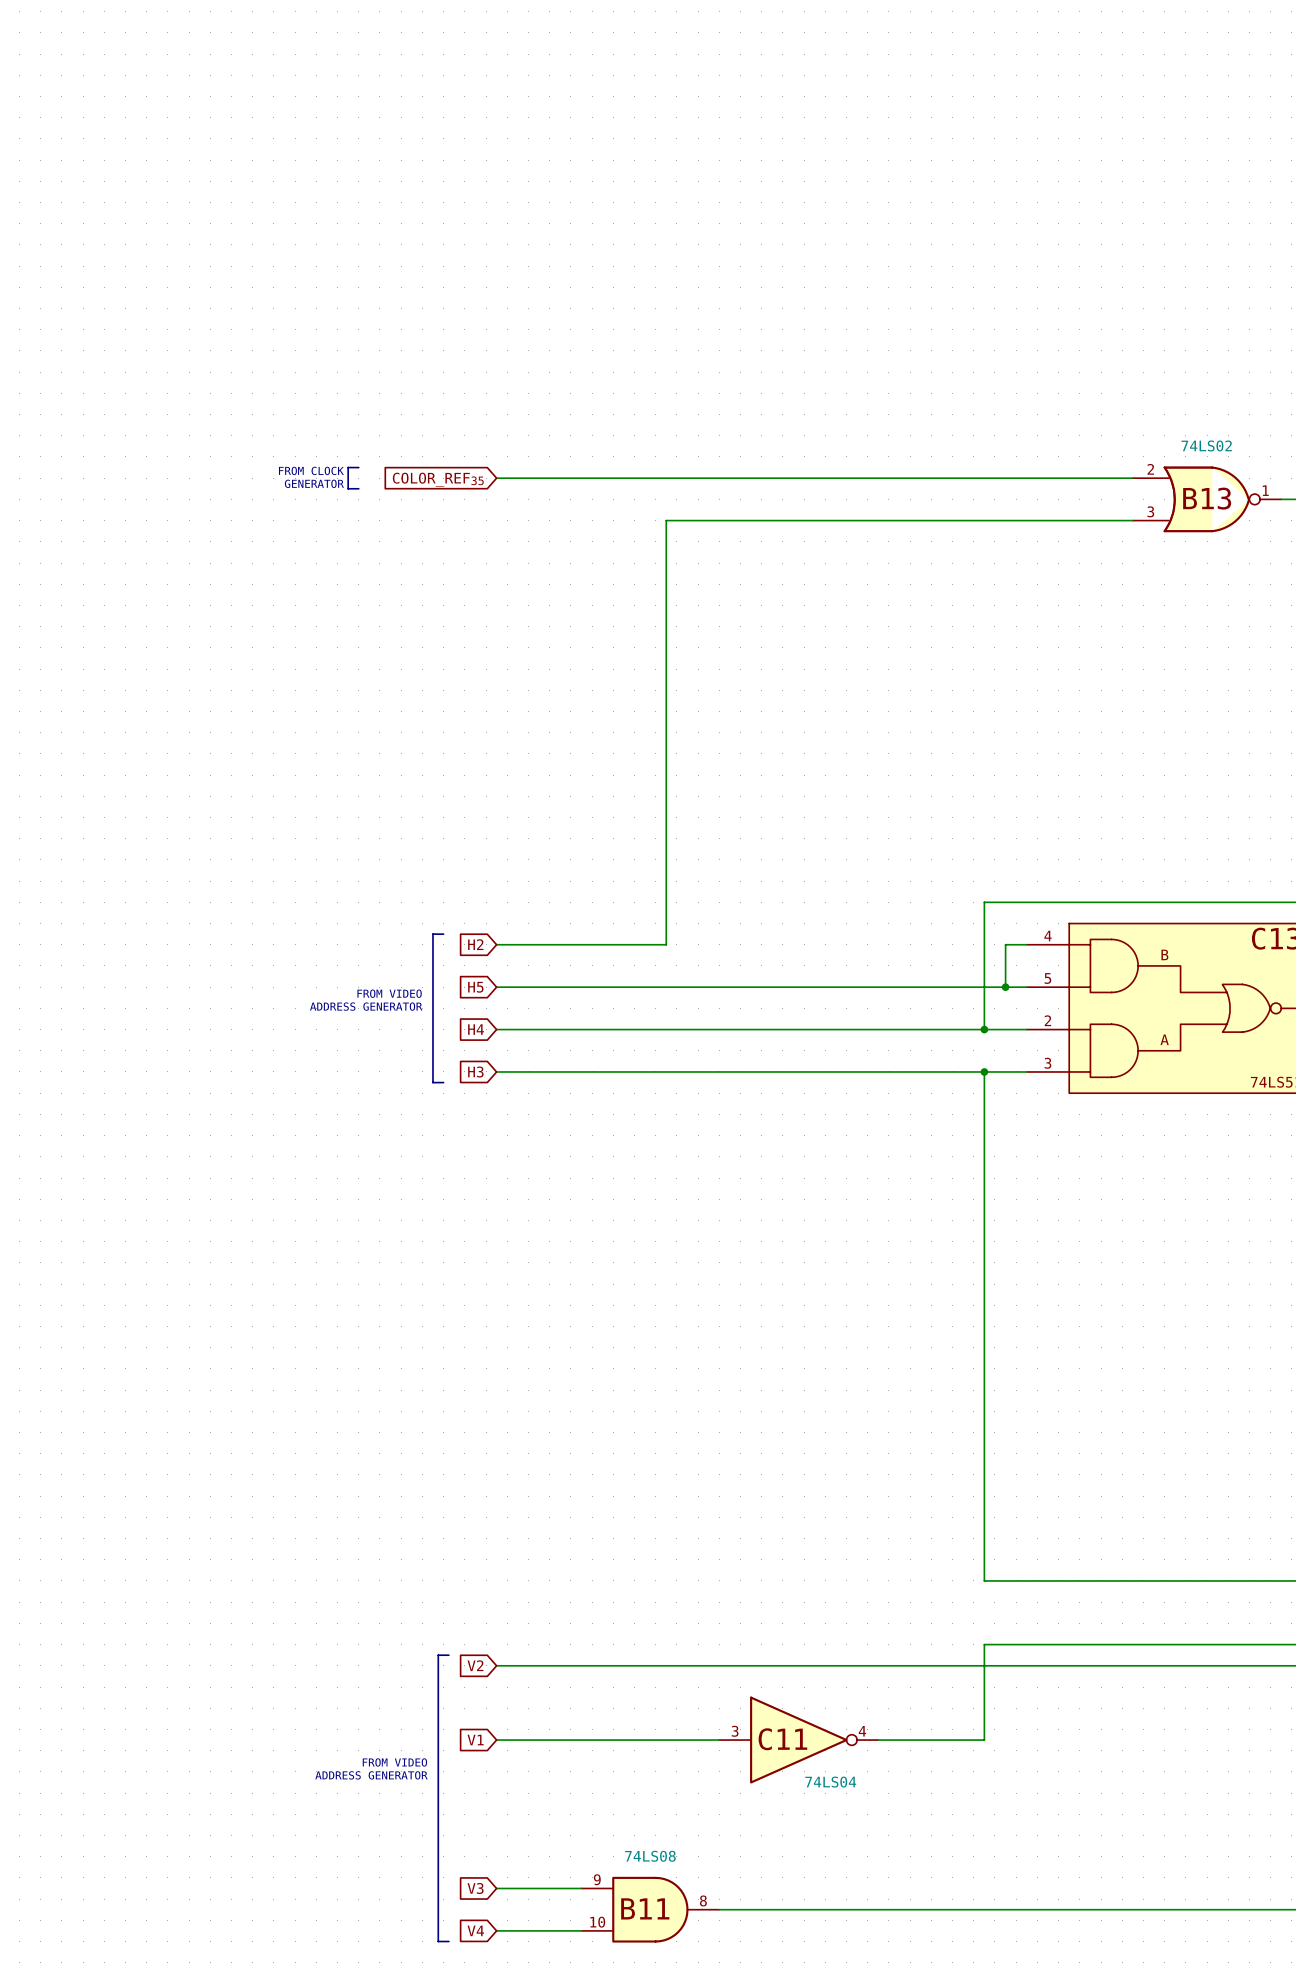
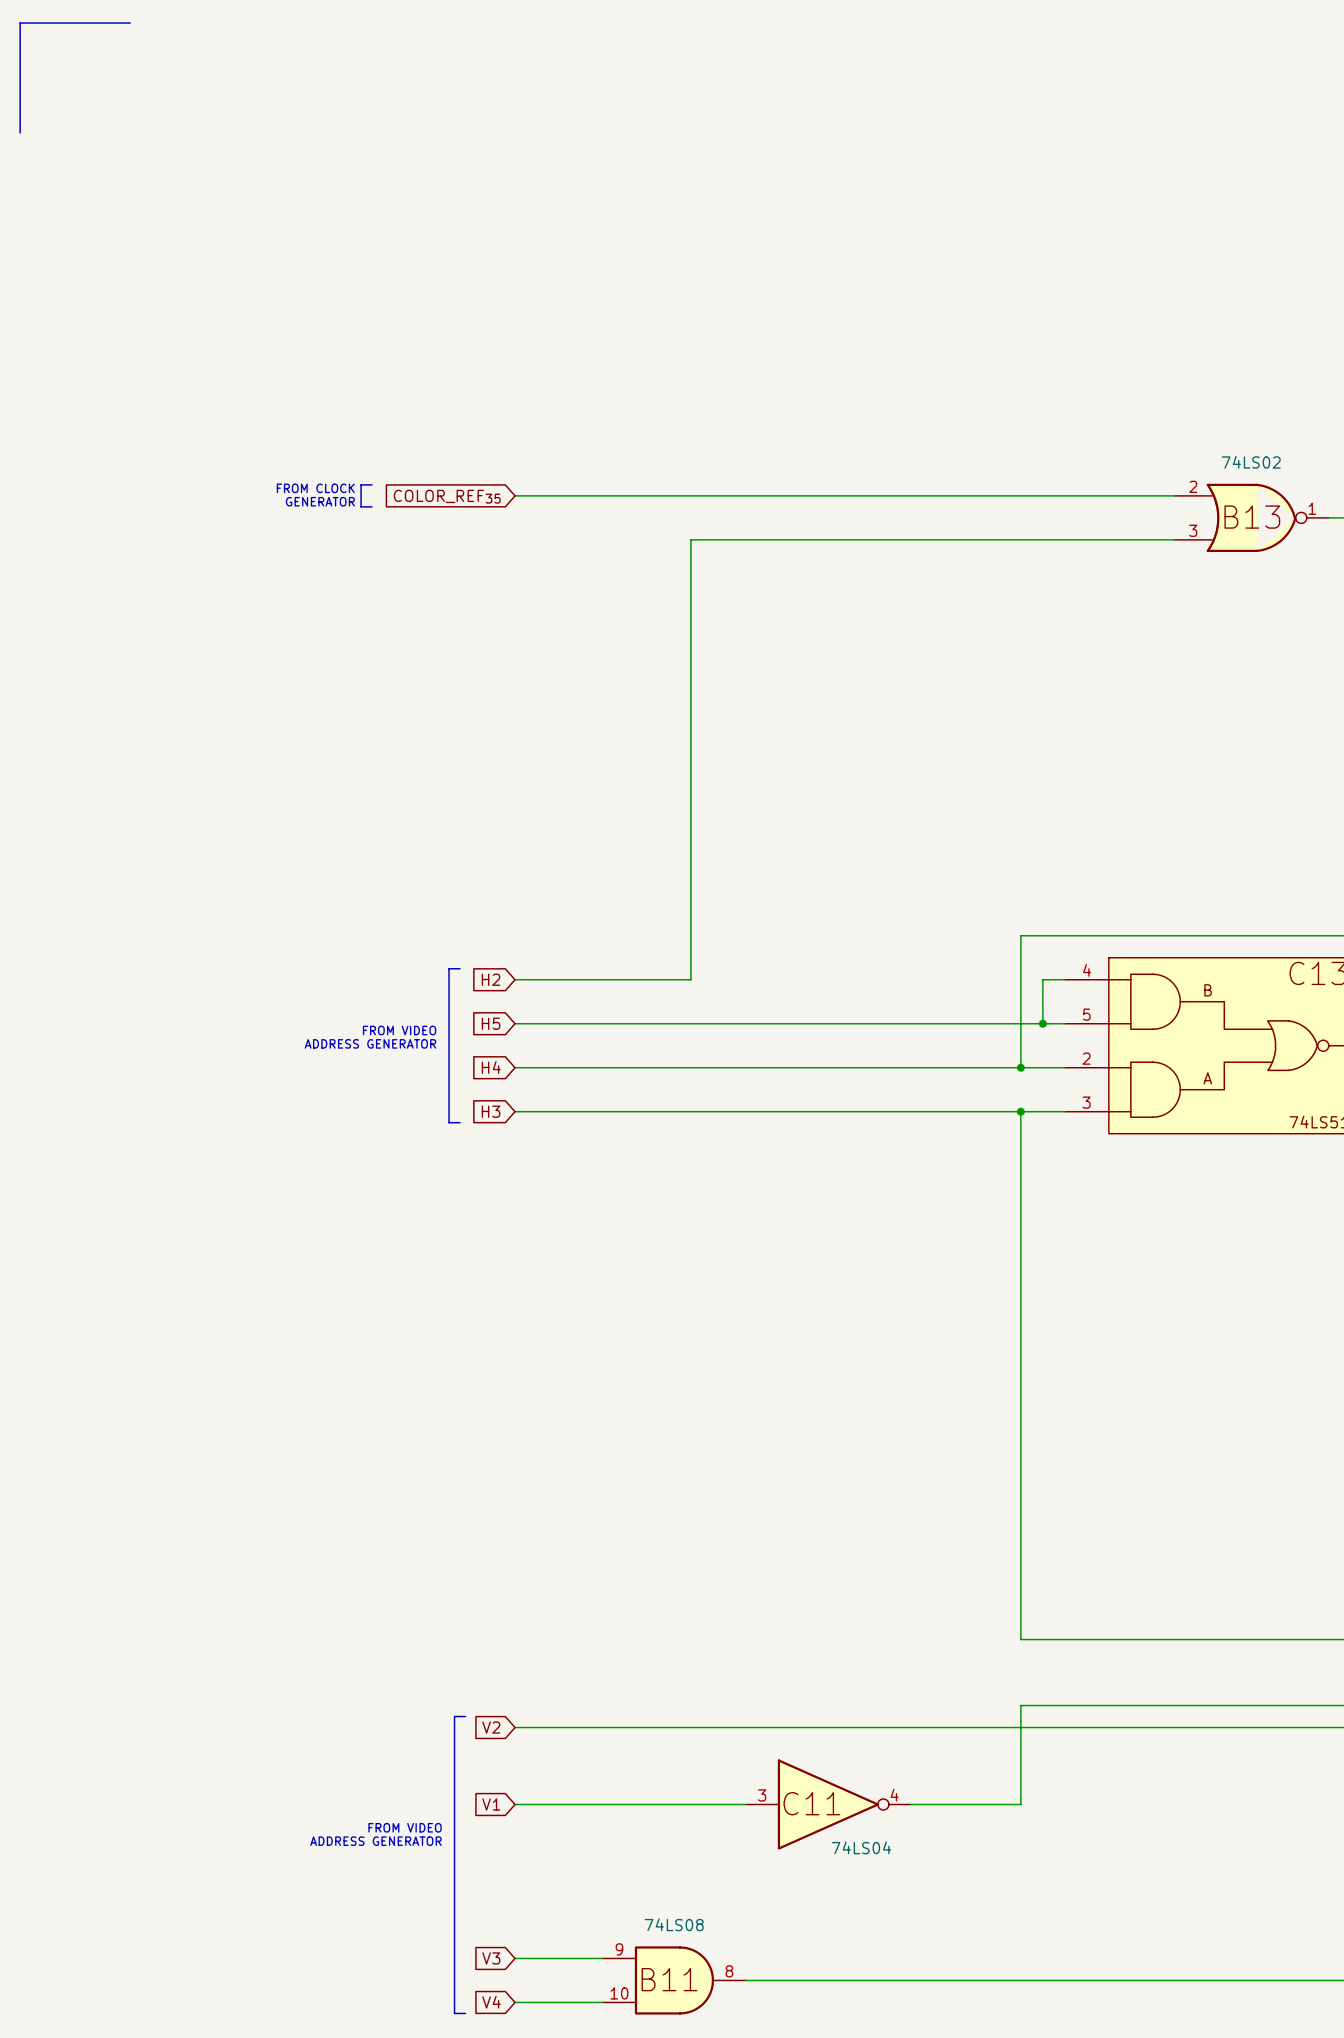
line: none -> (130, 23) (20, 23) (20, 133)

